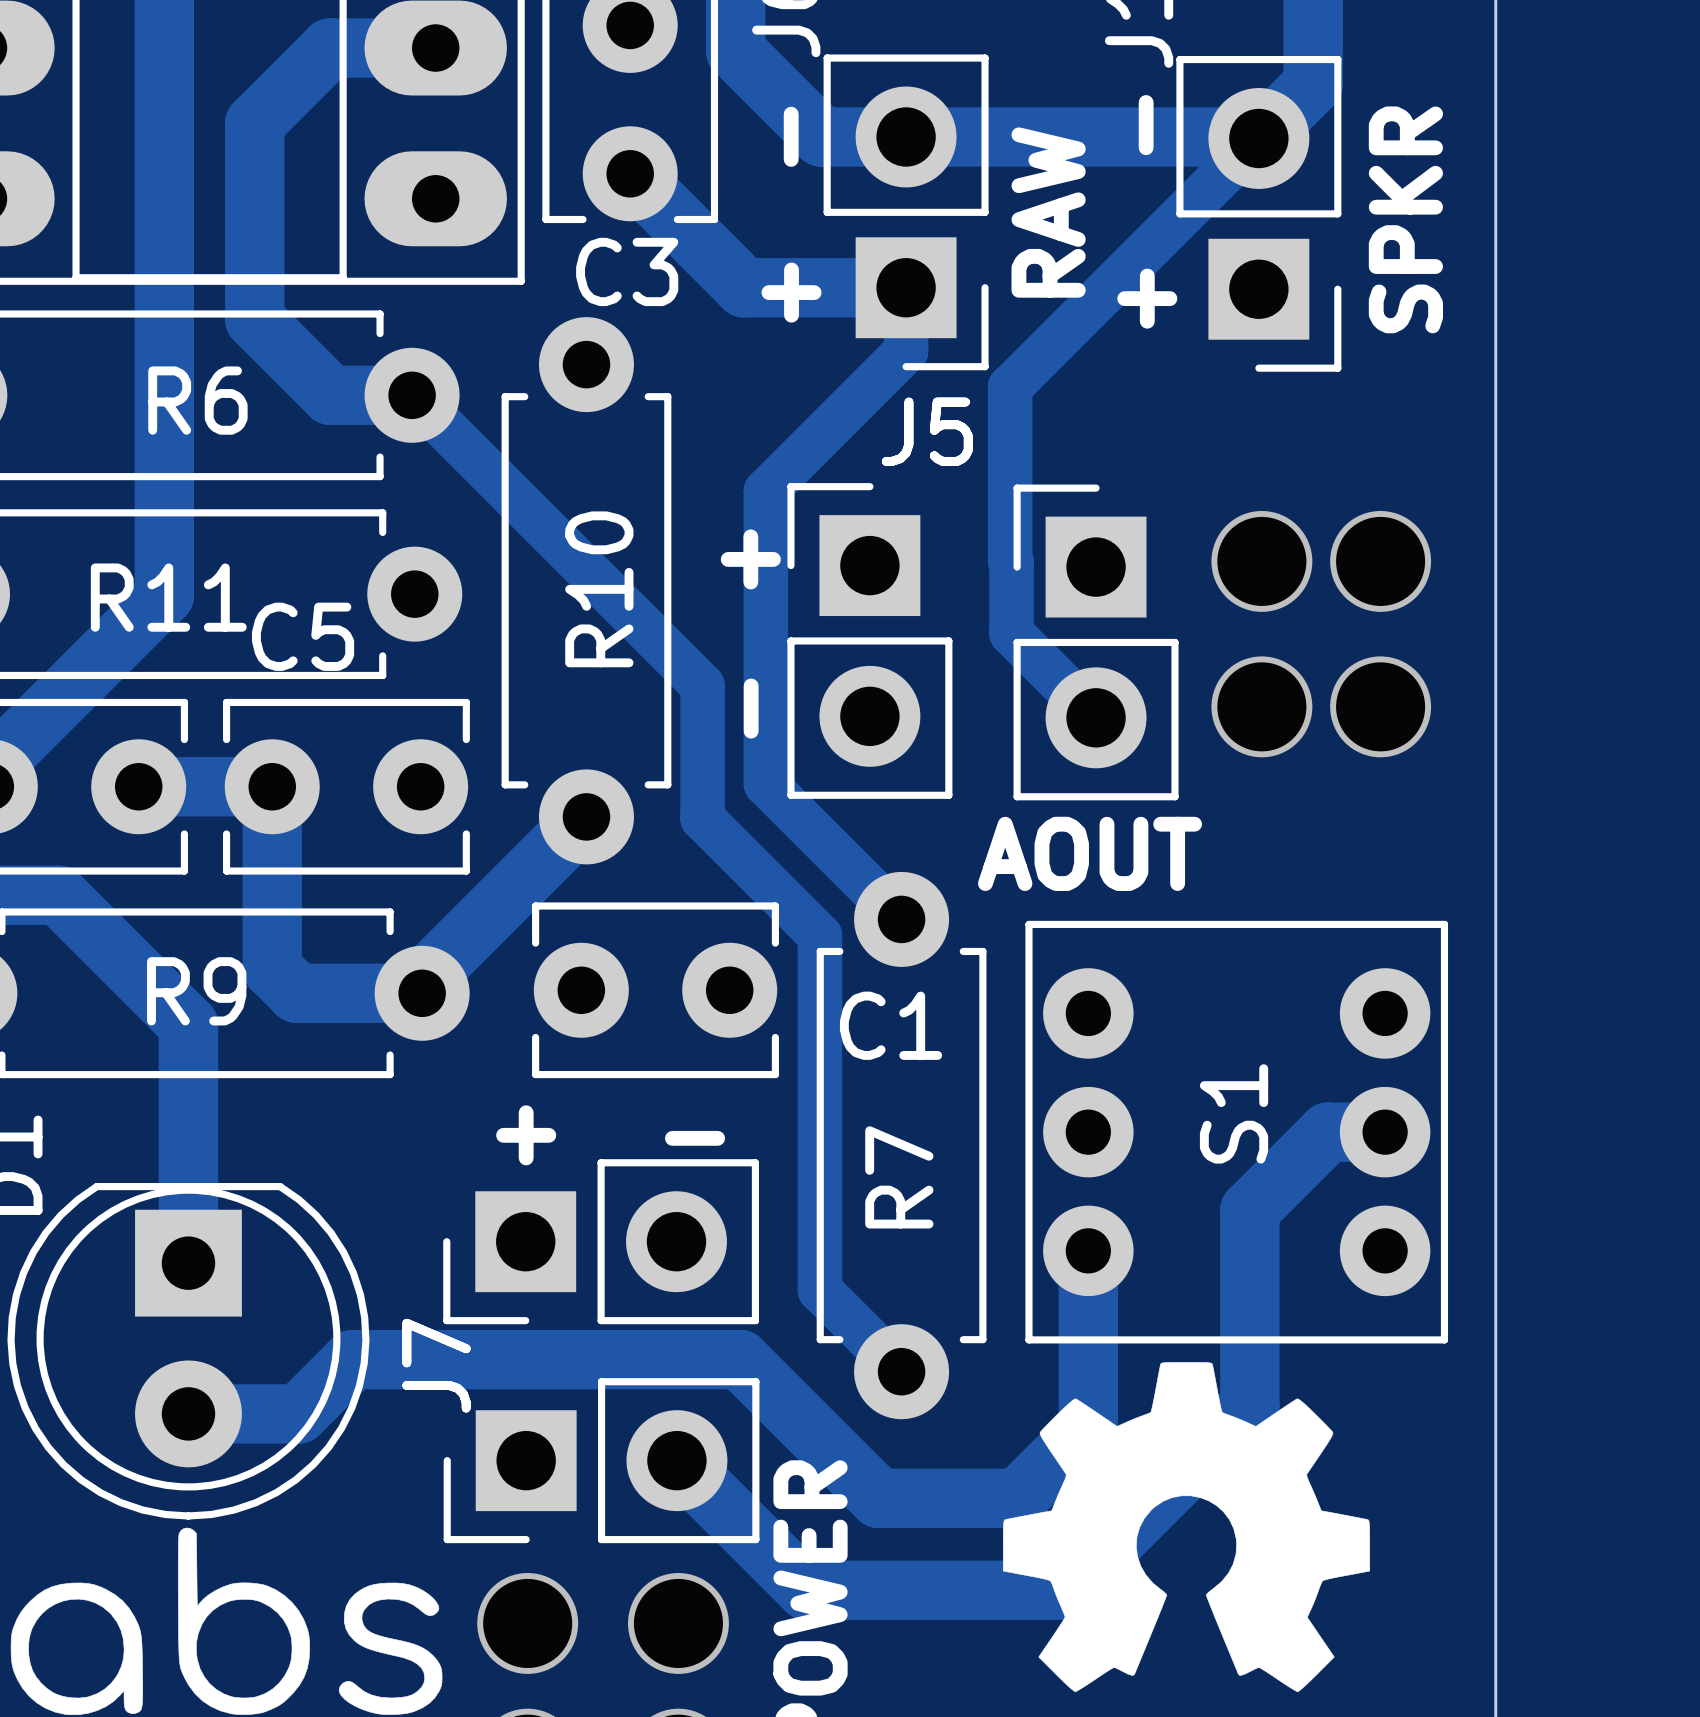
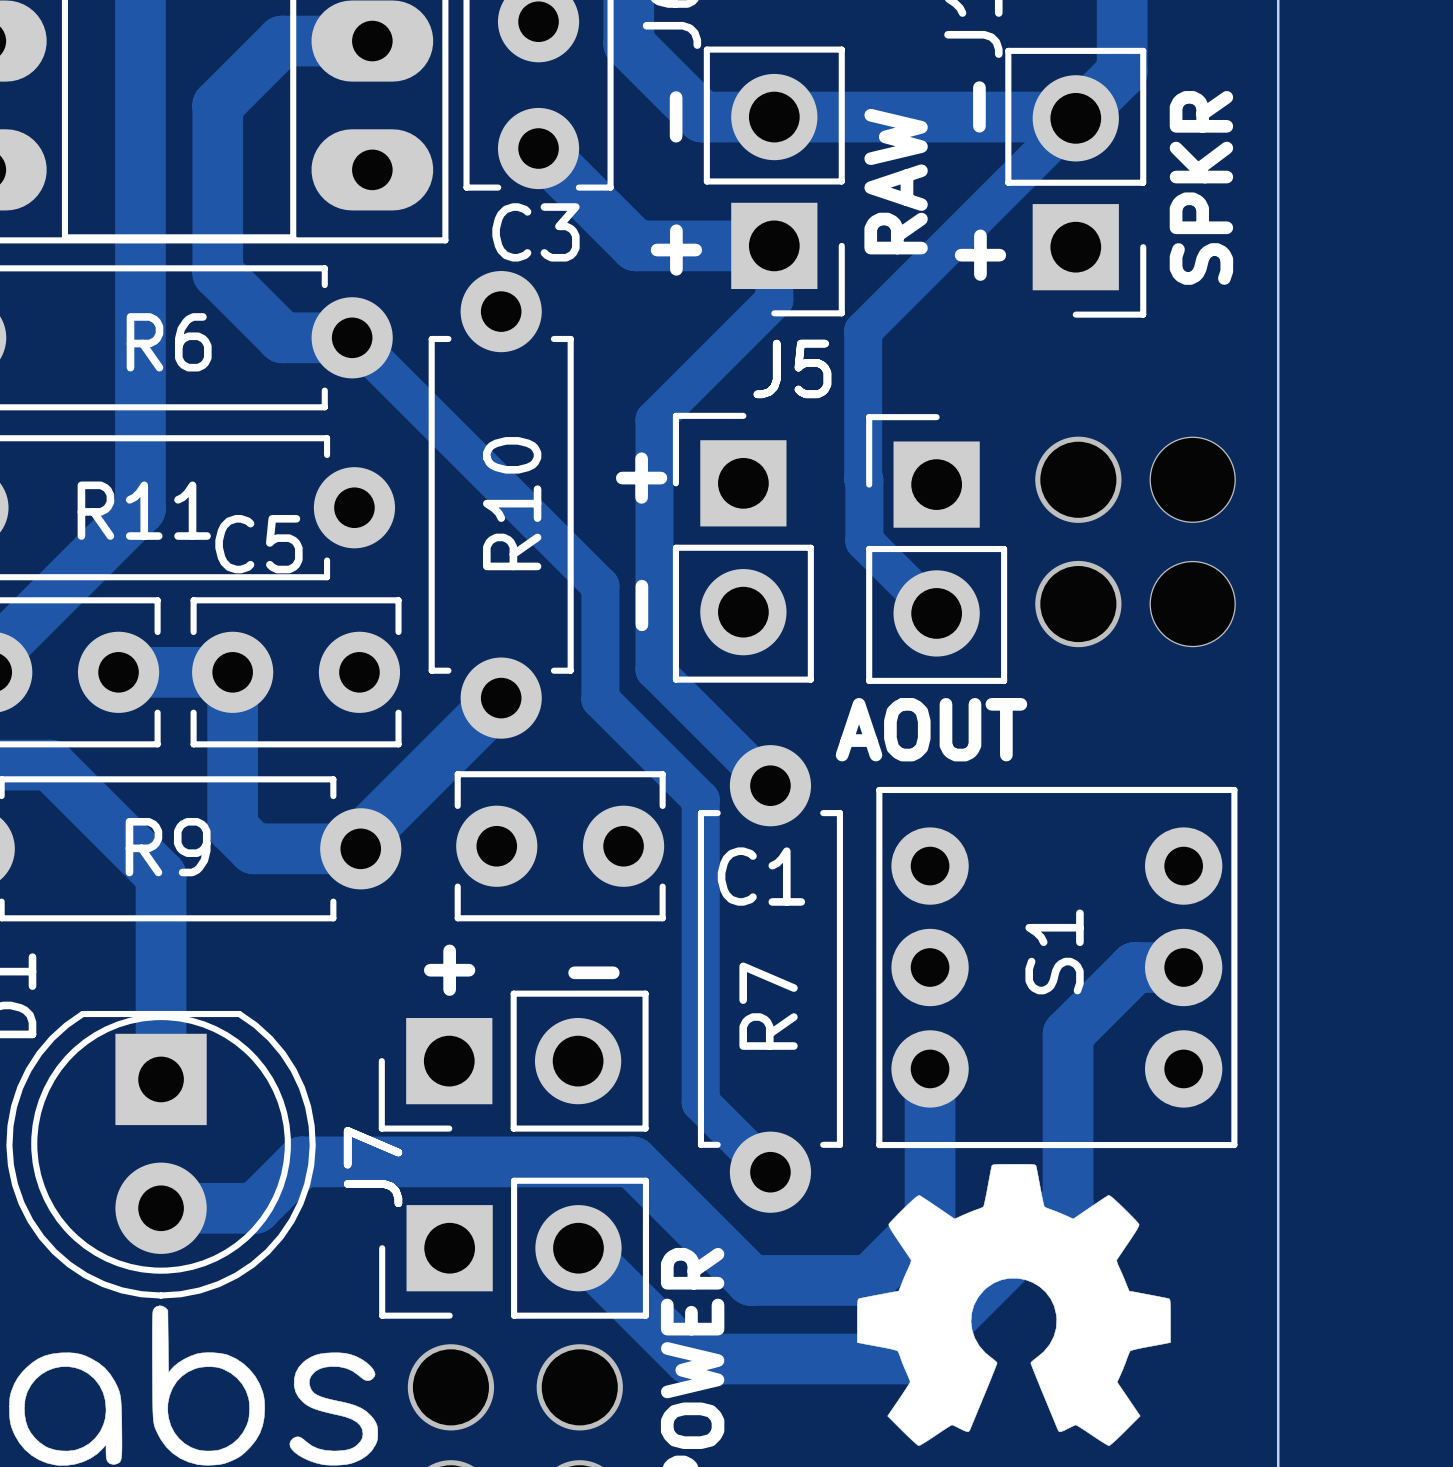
via position: (1380, 561) -> (1192, 479)
via position: (1380, 706) -> (1192, 604)

